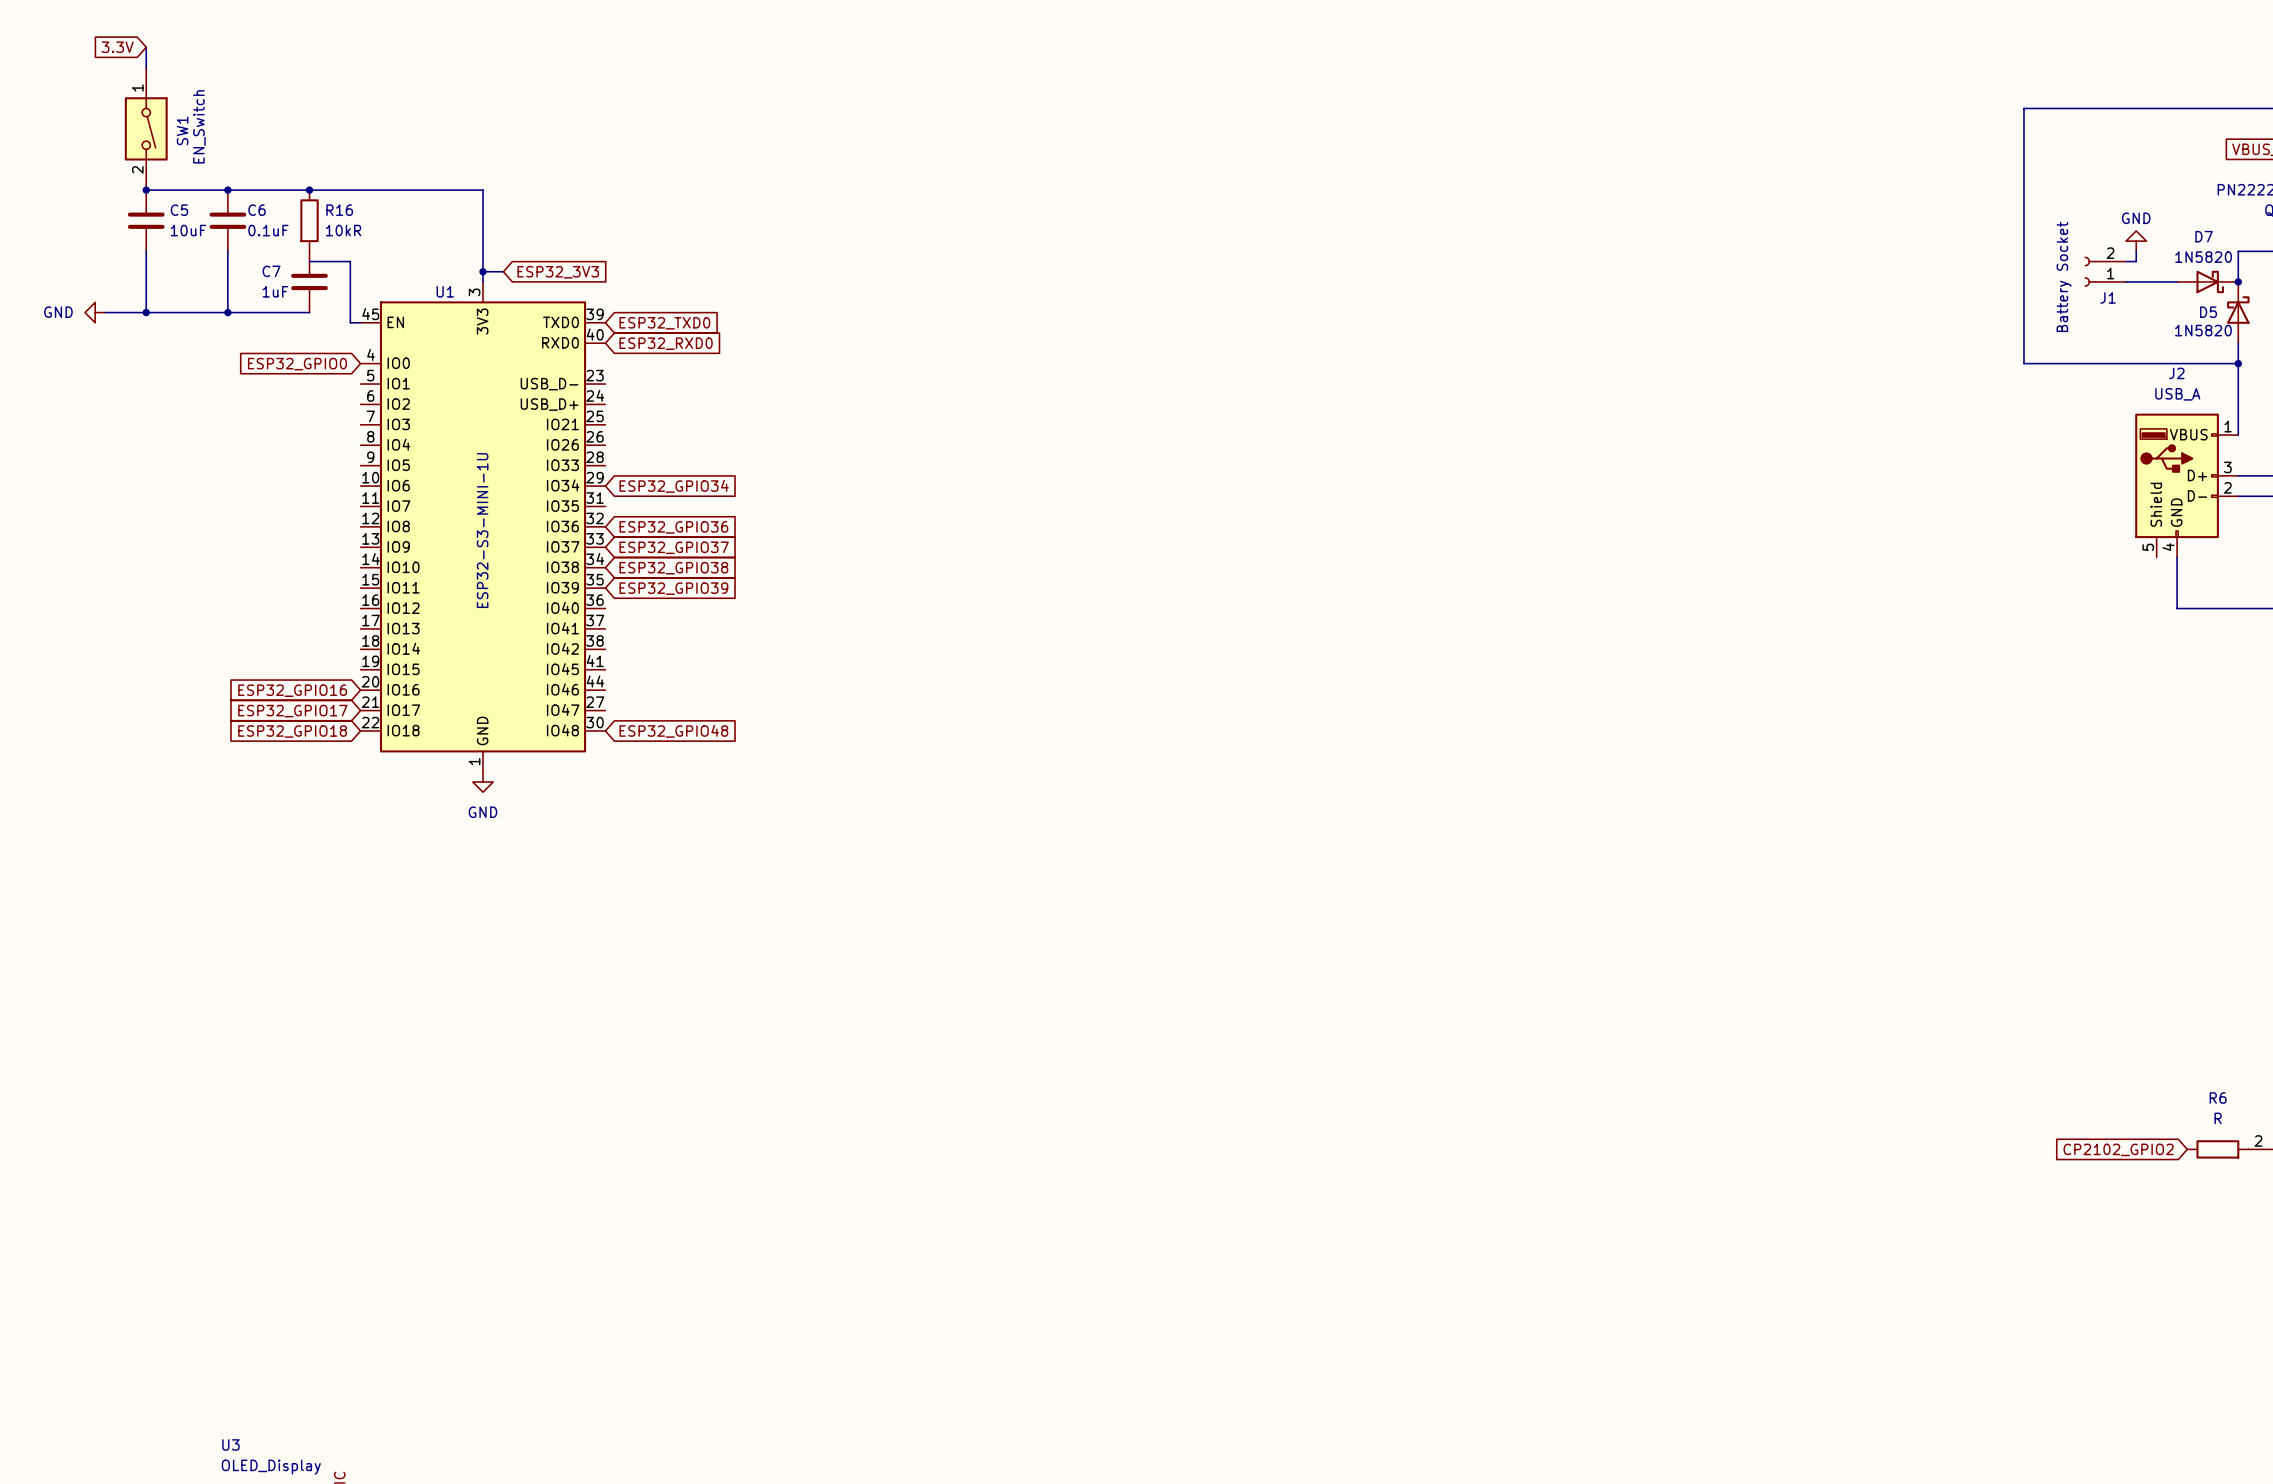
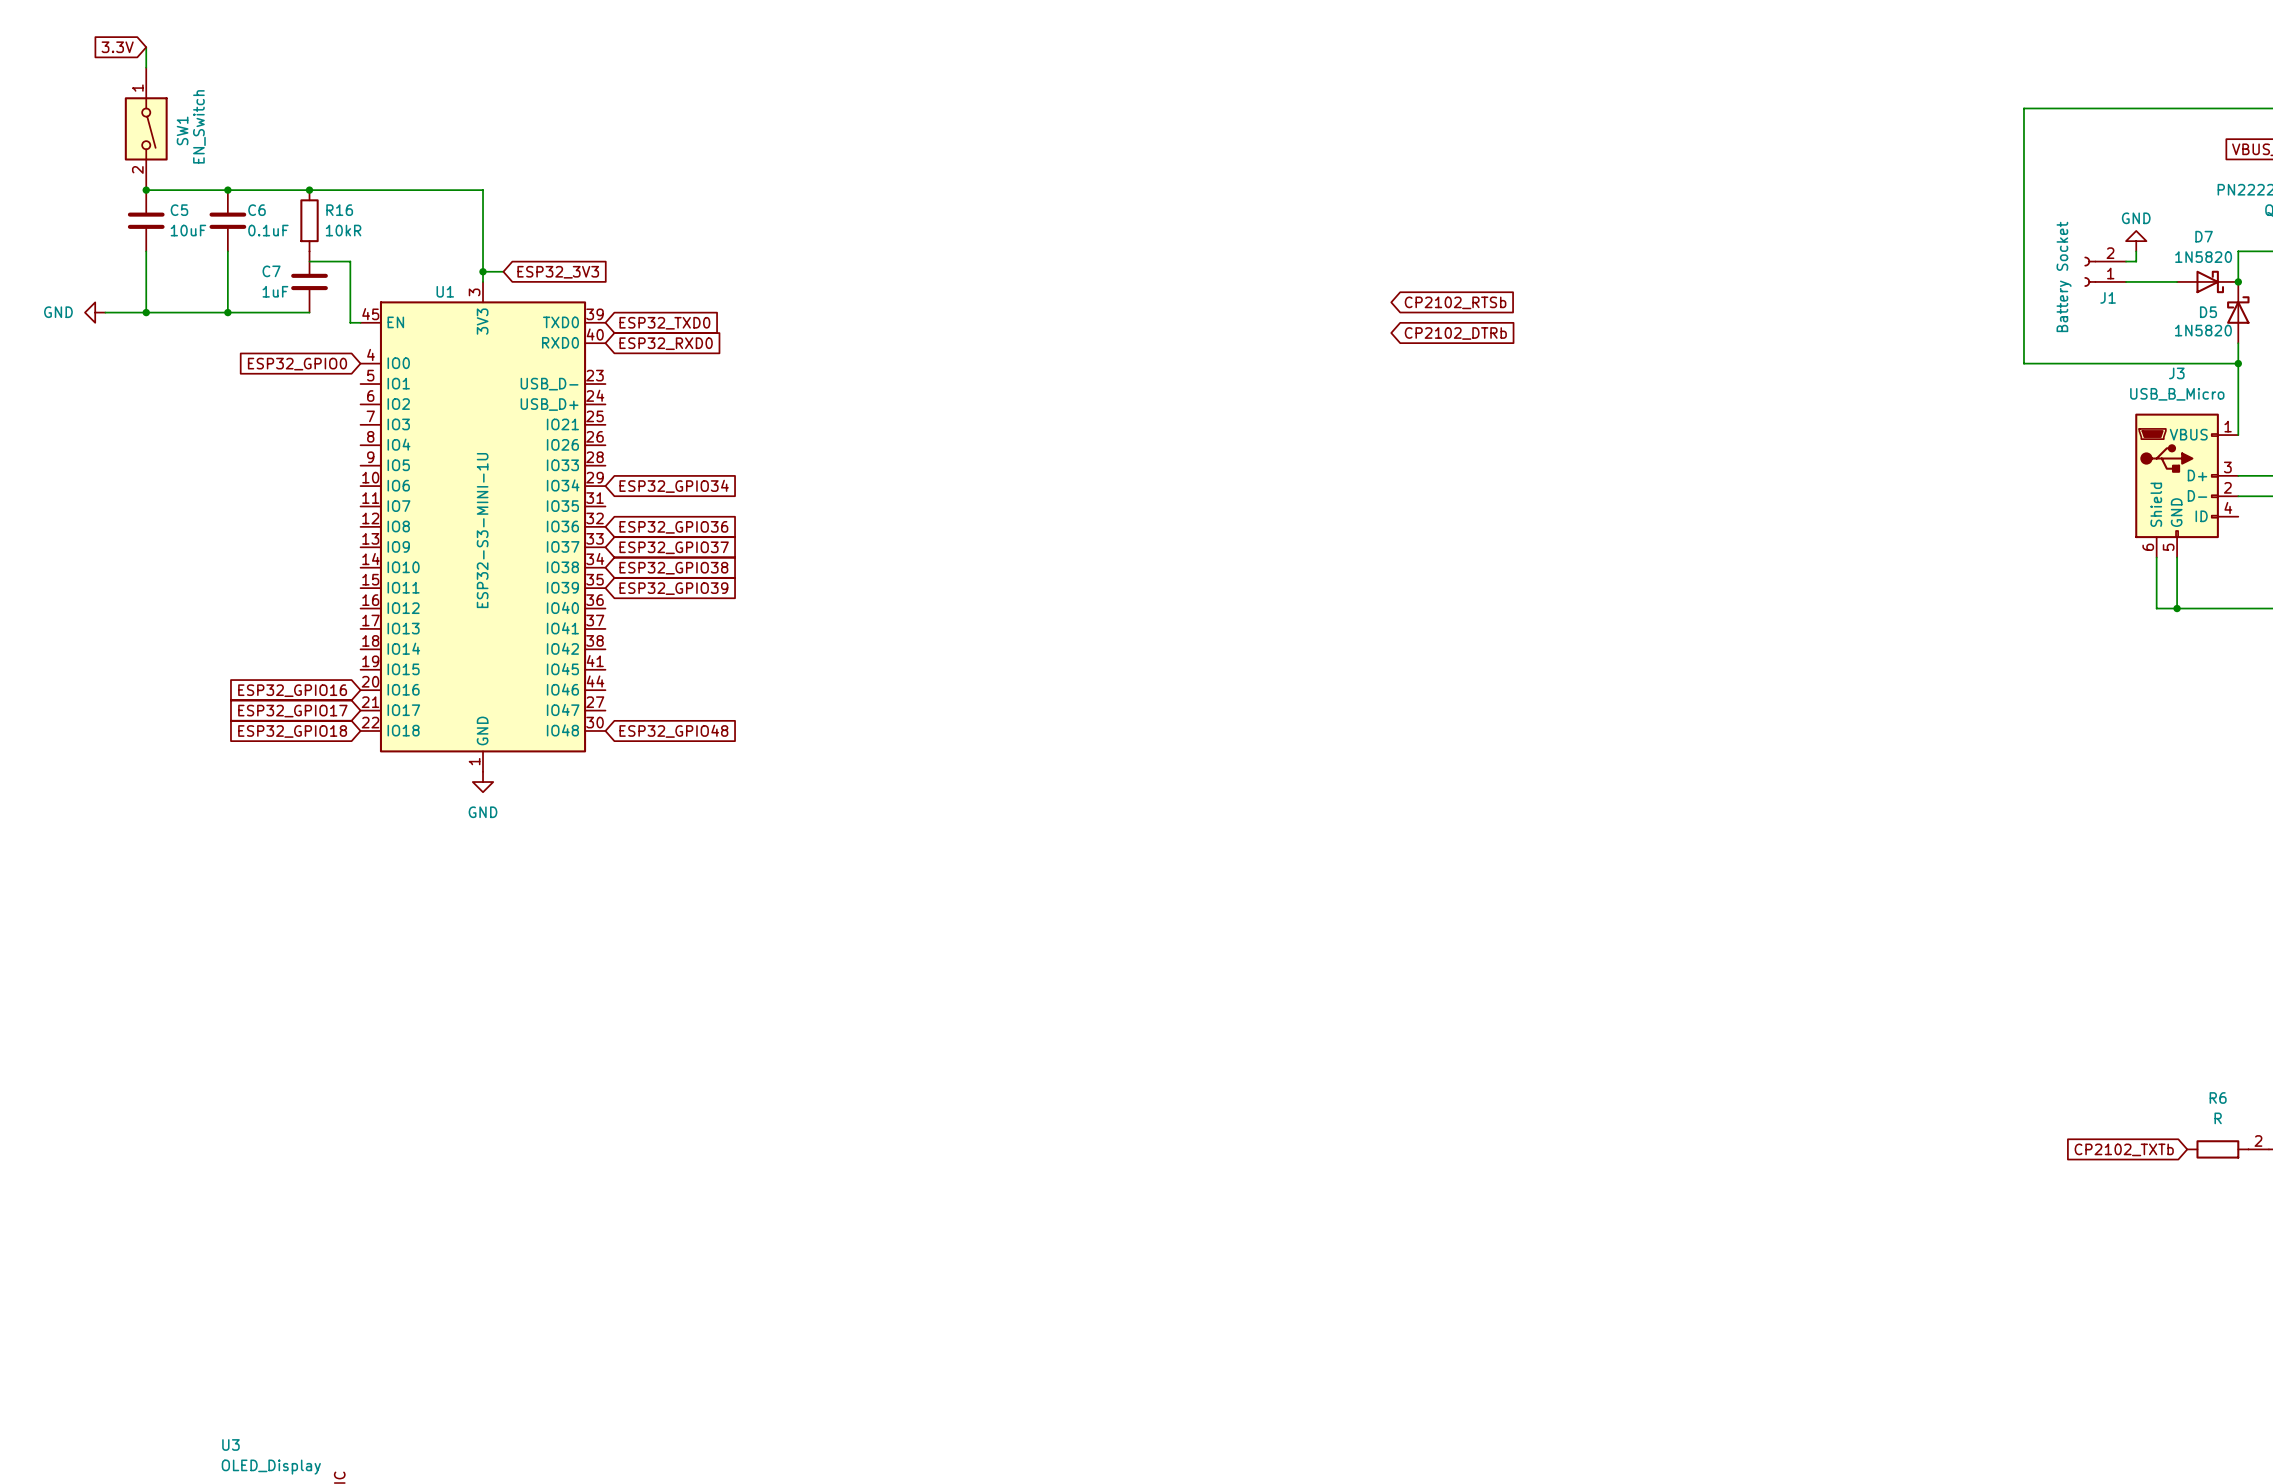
global label: none -> CP2102_RTSb (1455, 302)
global label: none -> CP2102_DTRb (1455, 333)
J2: USB_A (2186, 485) -> none
J3: none -> USB_B_Micro (2186, 485)
wire: none -> (2156, 557) (2156, 608) (2177, 608)
junction: none -> (2177, 608)
global label: CP2102_GPIO2 (2118, 1149) -> CP2102_TXTb (2124, 1149)

